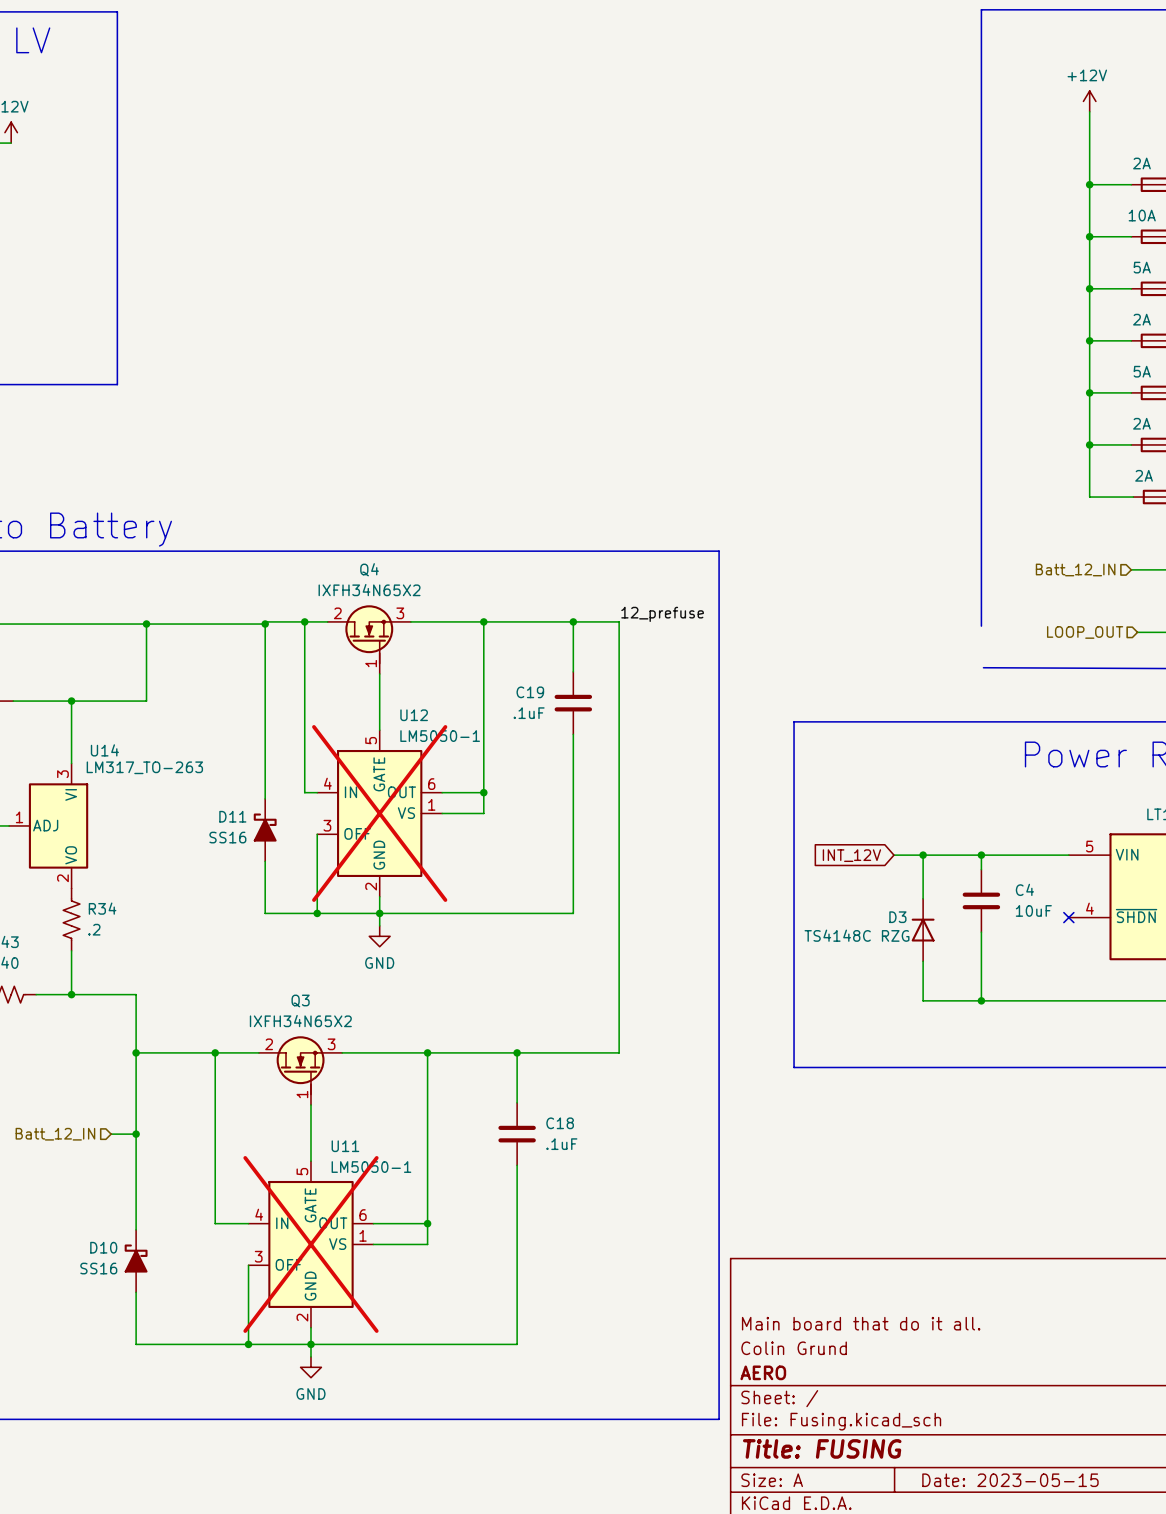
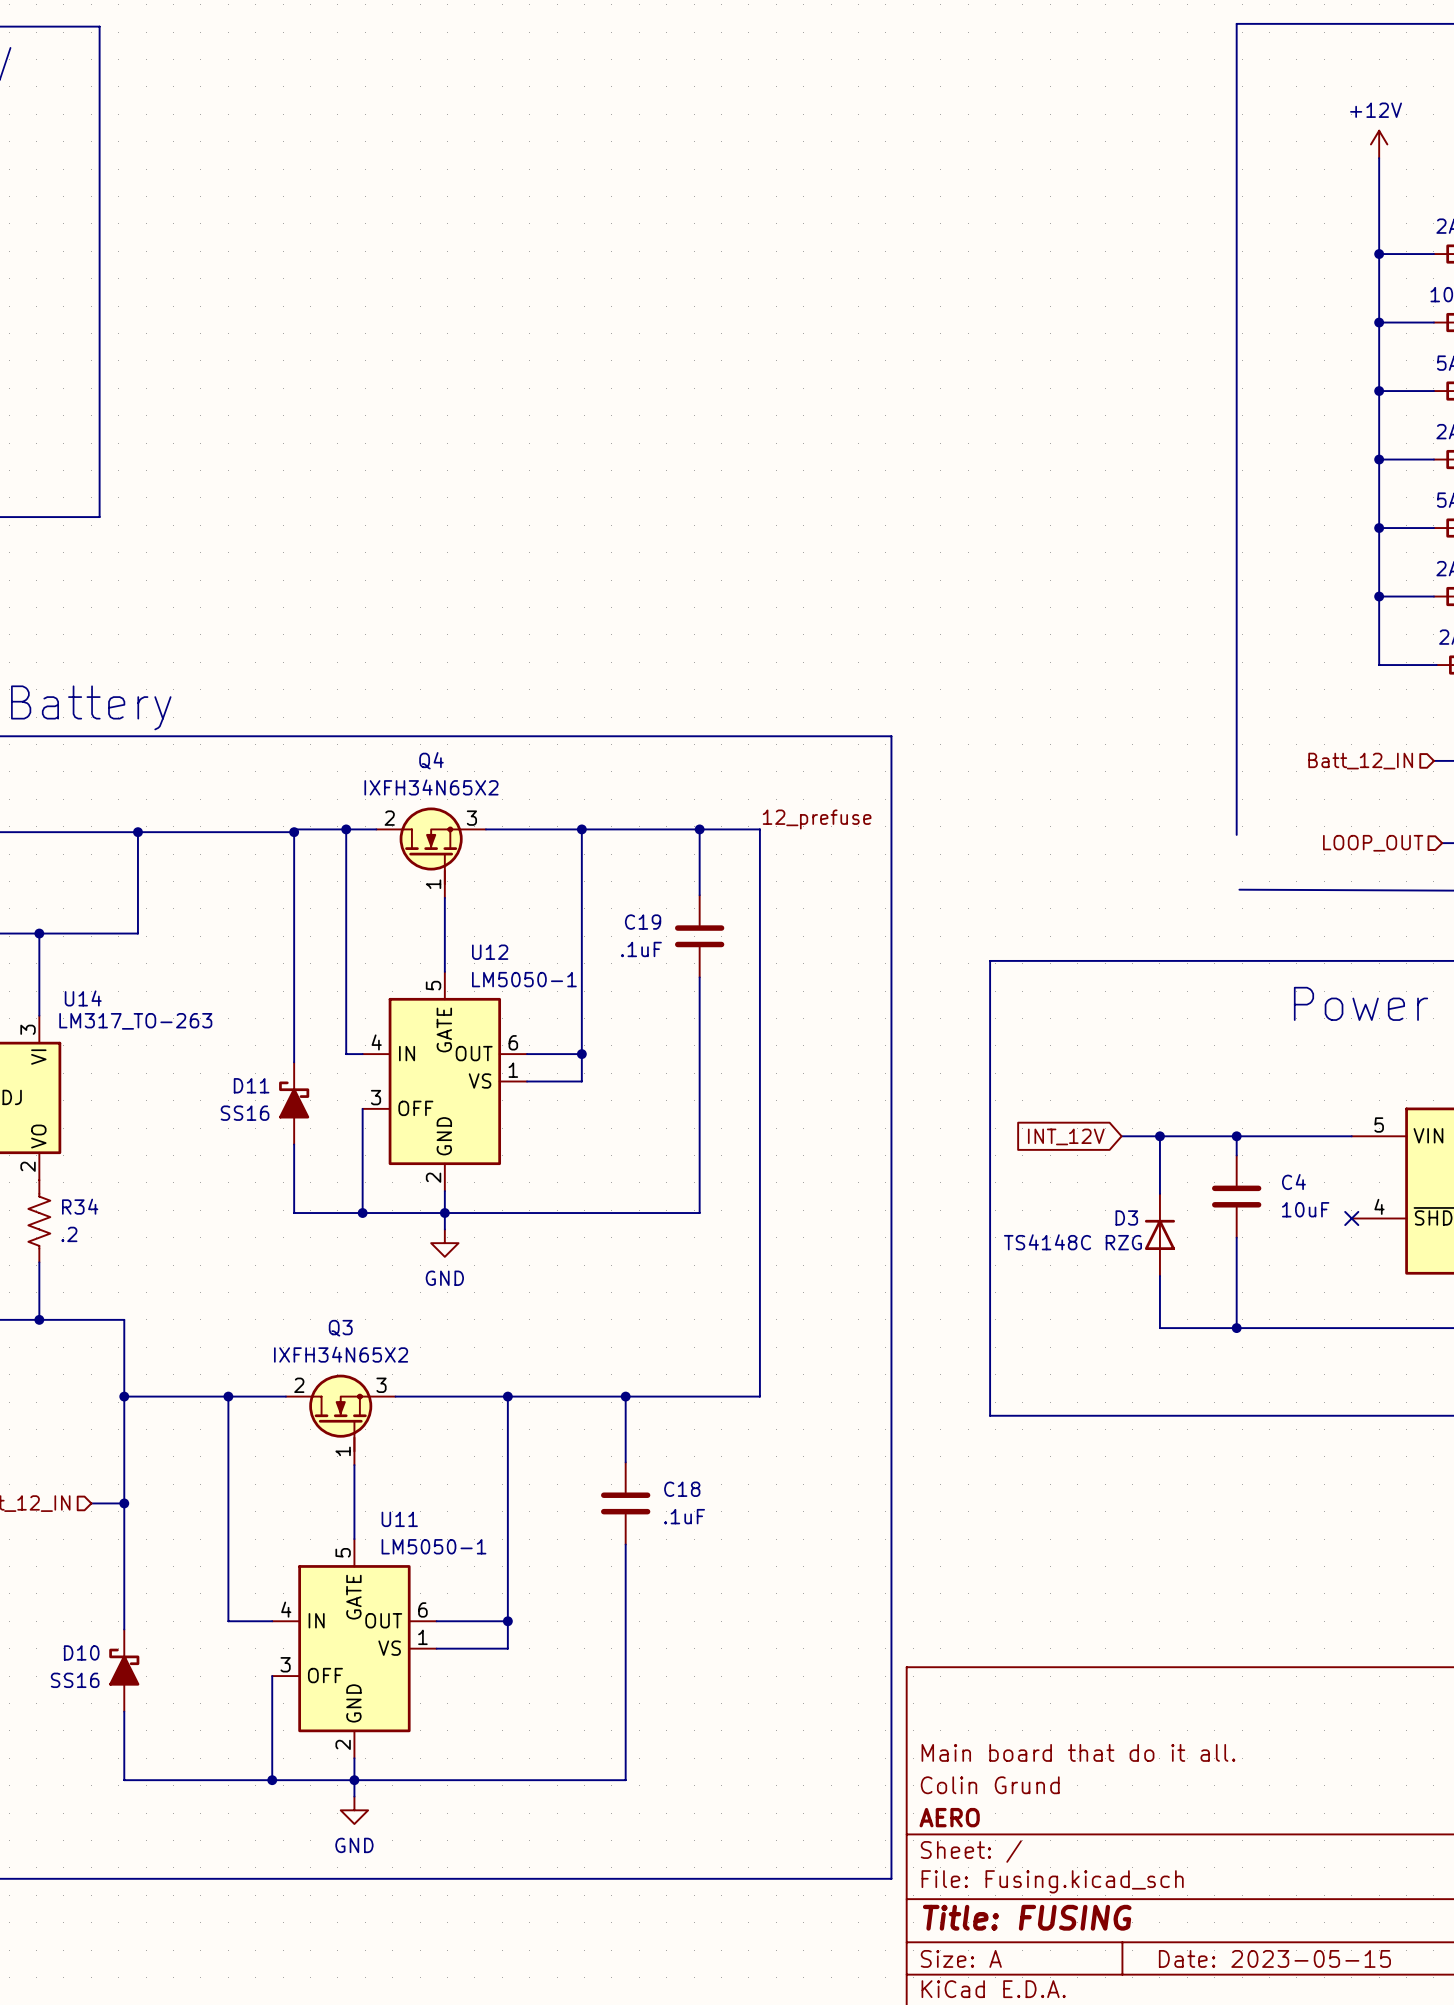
U12 do-not-place cross: (379, 813) -> none
U11 do-not-place cross: (310, 1244) -> none

